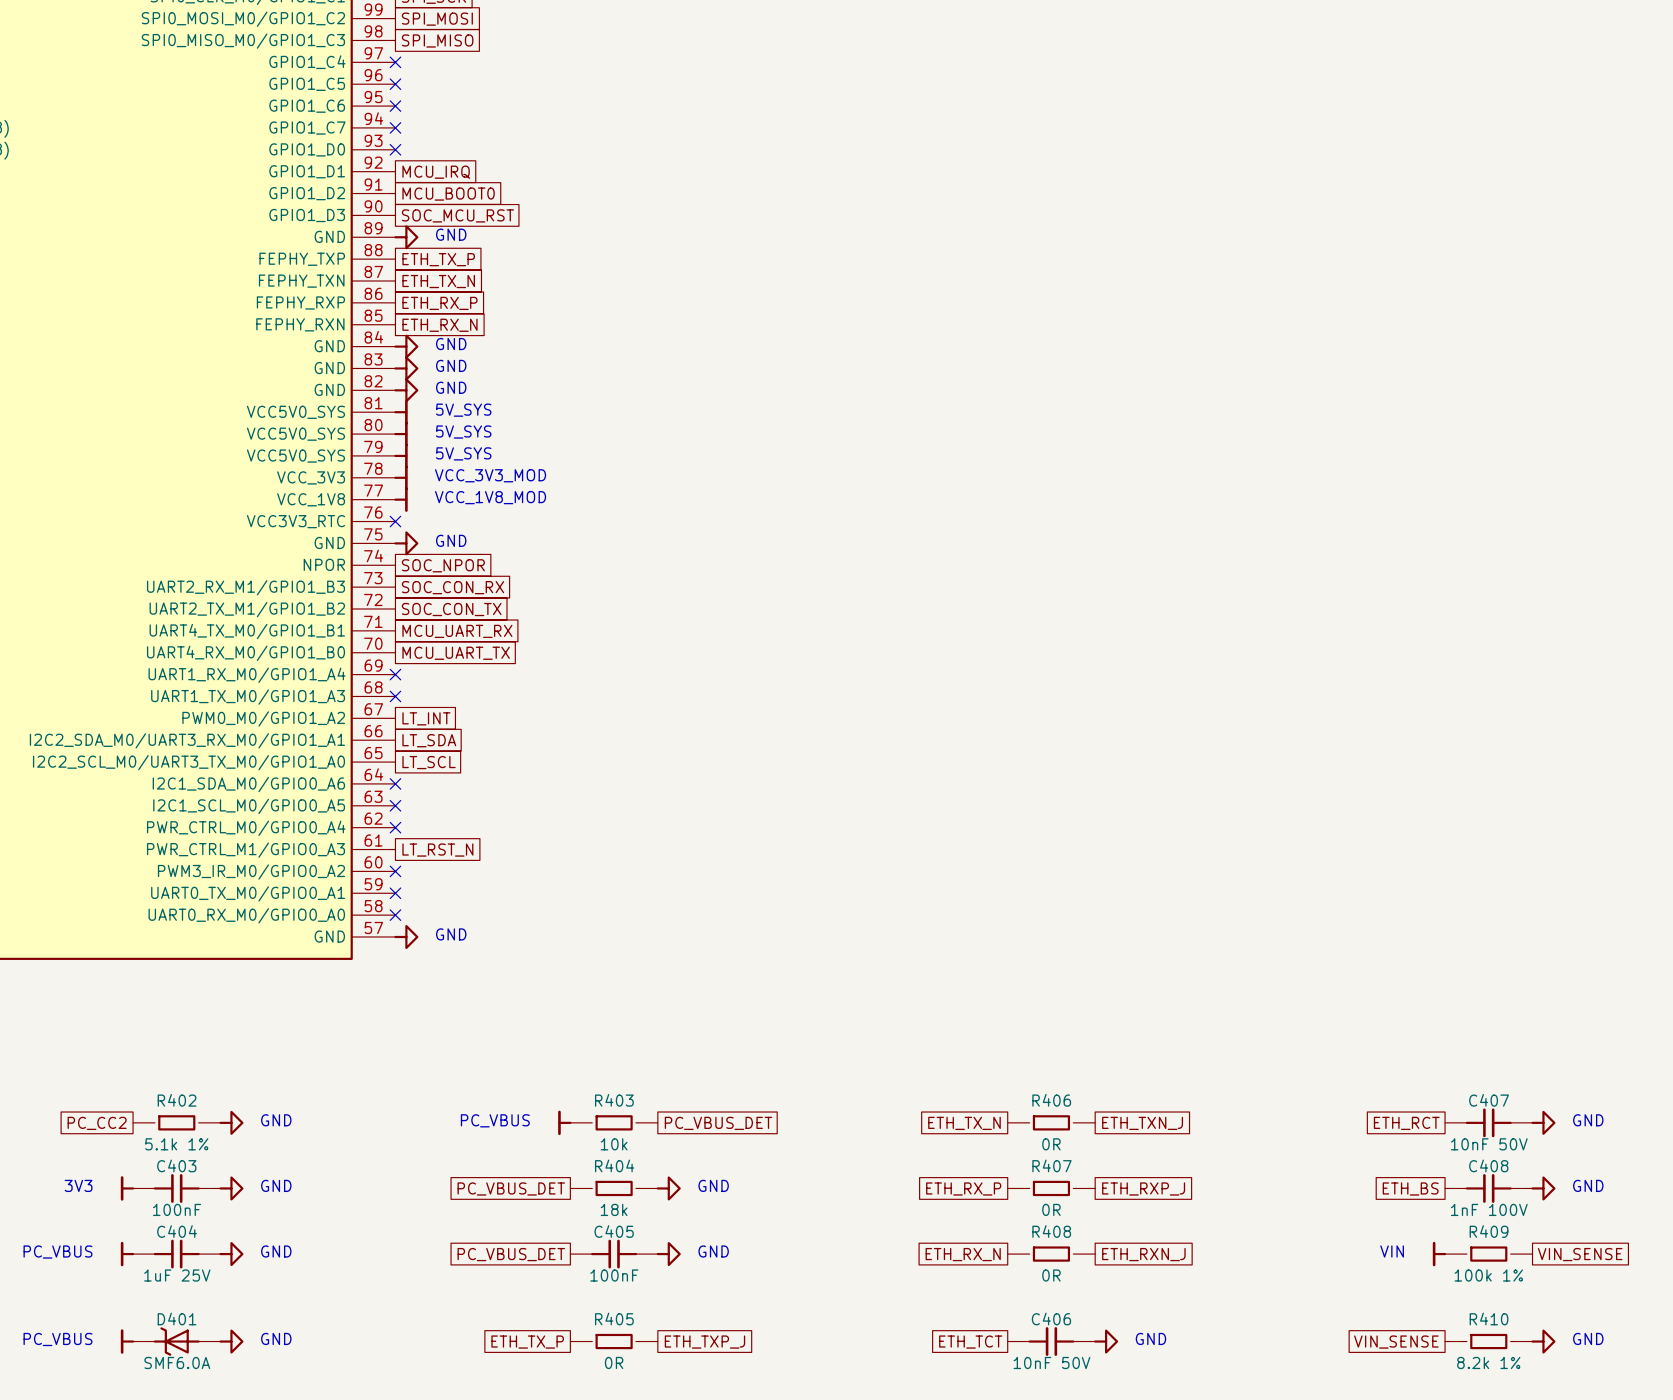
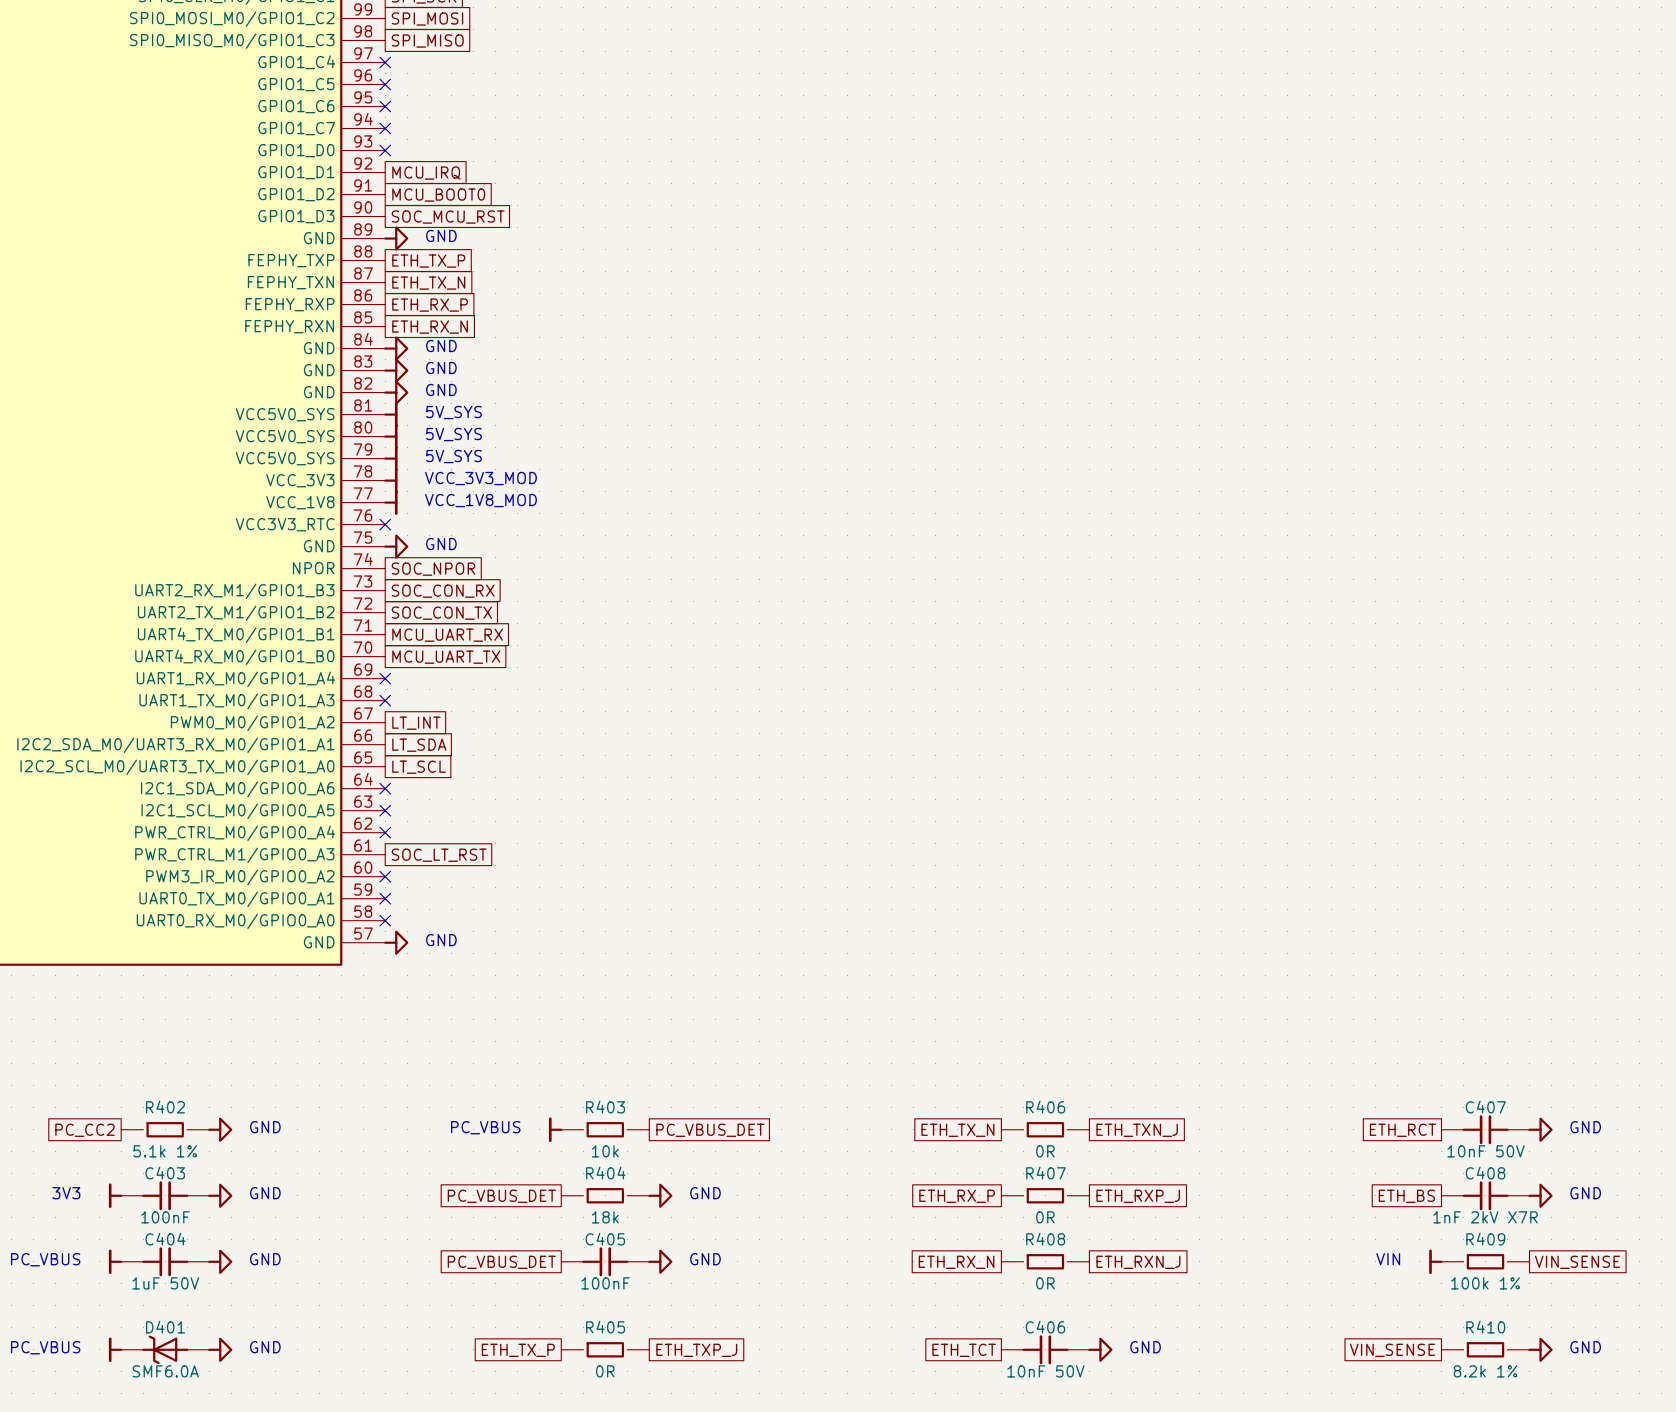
global label: LT_RST_N (437, 850) -> SOC_LT_RST (439, 855)
C408 value: 1nF 100V (1489, 1209) -> 1nF 2kV X7R (1485, 1217)
C404 value: 1uF 25V (177, 1275) -> 1uF 50V (165, 1283)

